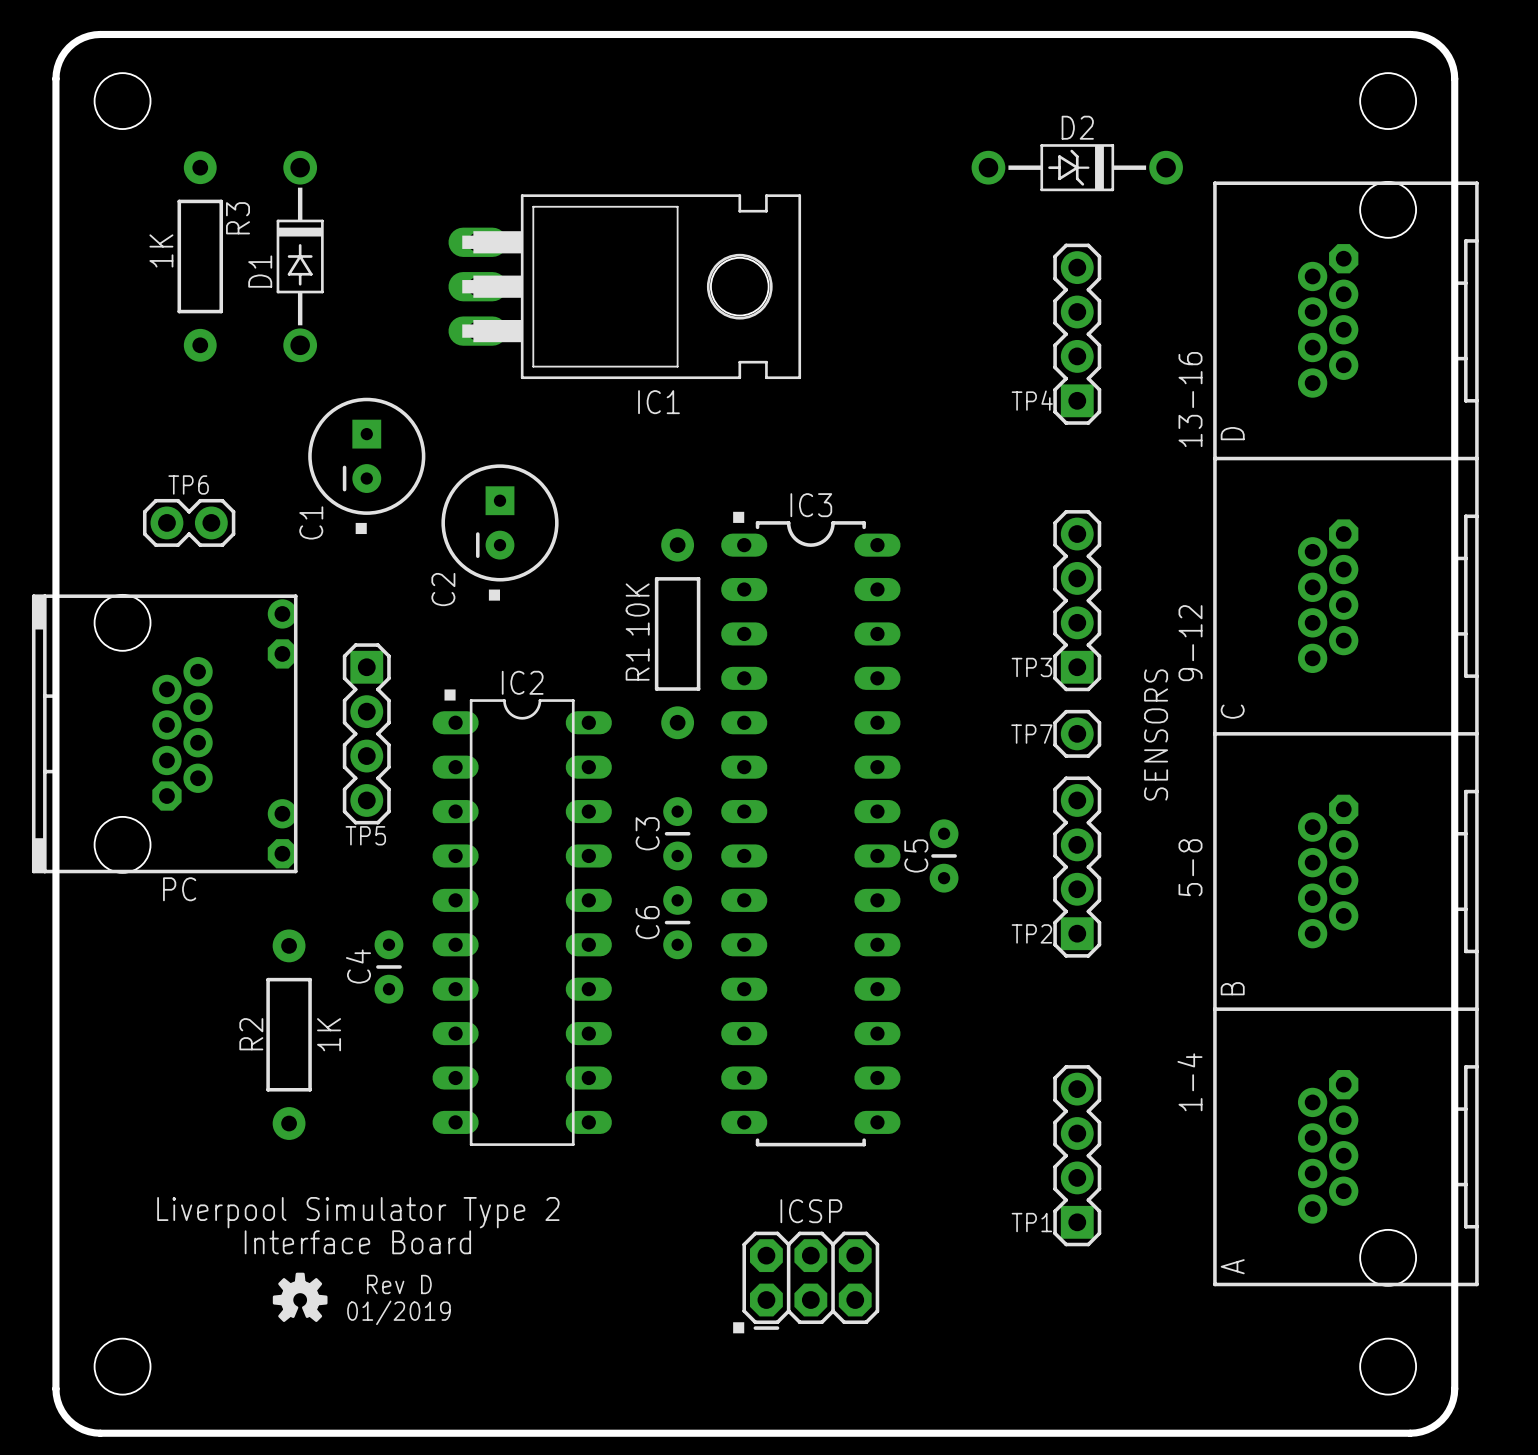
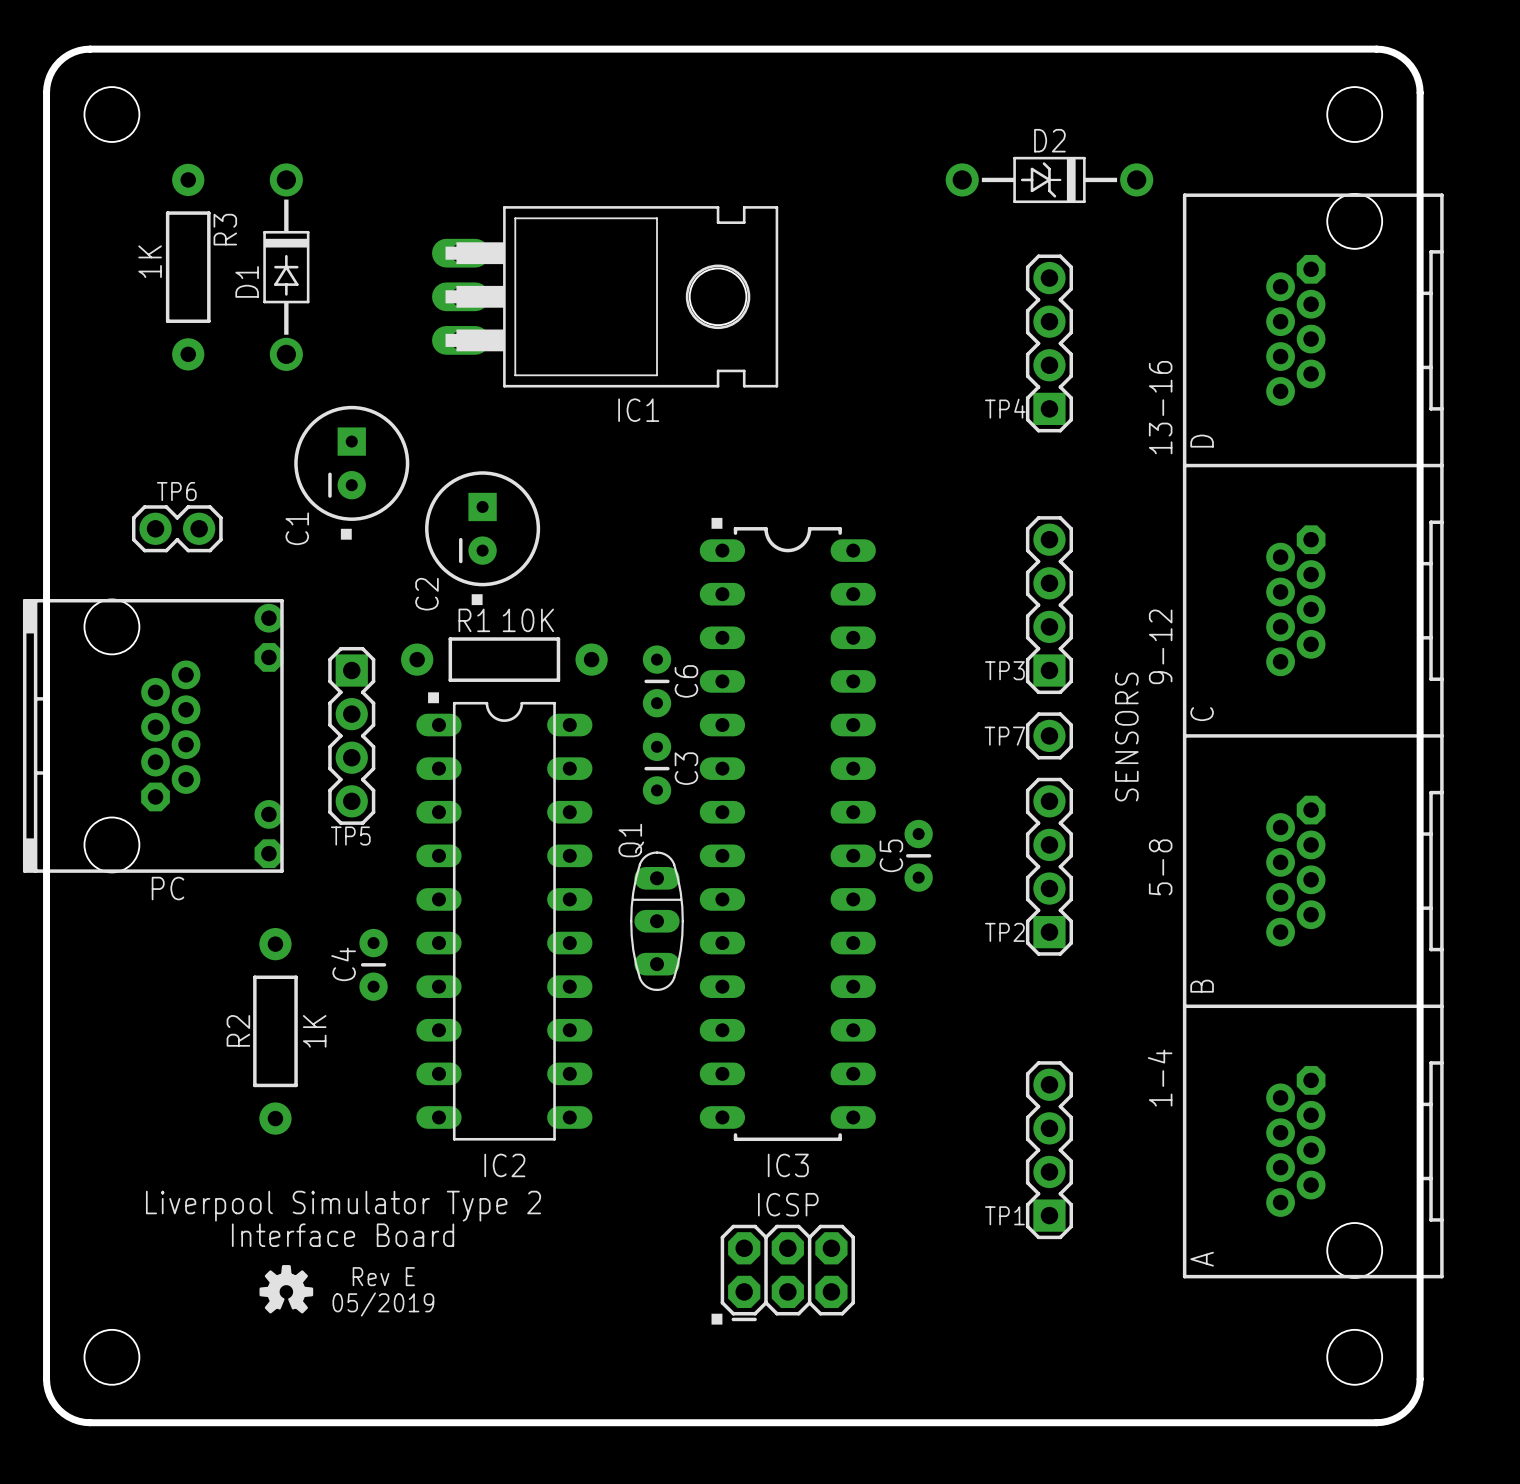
IC3 name position: IC3 (811, 505) -> IC3 (788, 1165)
R1 rotation: 0° (677, 633) -> 90° clockwise (504, 659)
R1 position: (677, 633) -> (504, 659)
IC2 name position: IC2 (522, 682) -> IC2 (504, 1165)
C3 name position: C3 (647, 833) -> C3 (686, 768)
C3 position: (677, 833) -> (657, 768)
C6 name position: C6 (647, 922) -> C6 (686, 681)
C6 position: (677, 922) -> (657, 681)
Q1: none -> (657, 921)
text: Rev D (399, 1284) -> Rev E (383, 1276)
text: 01/2019 (398, 1312) -> 05/2019 (383, 1304)

